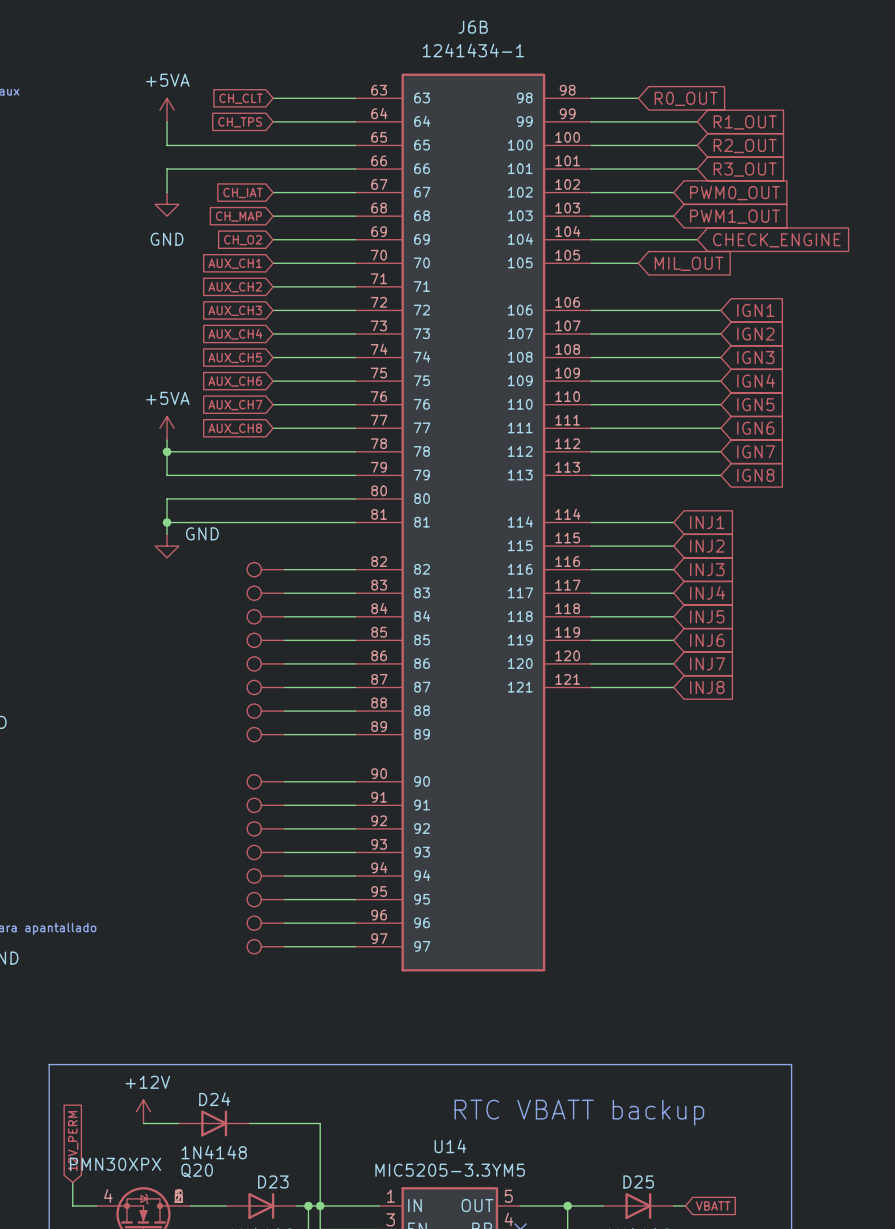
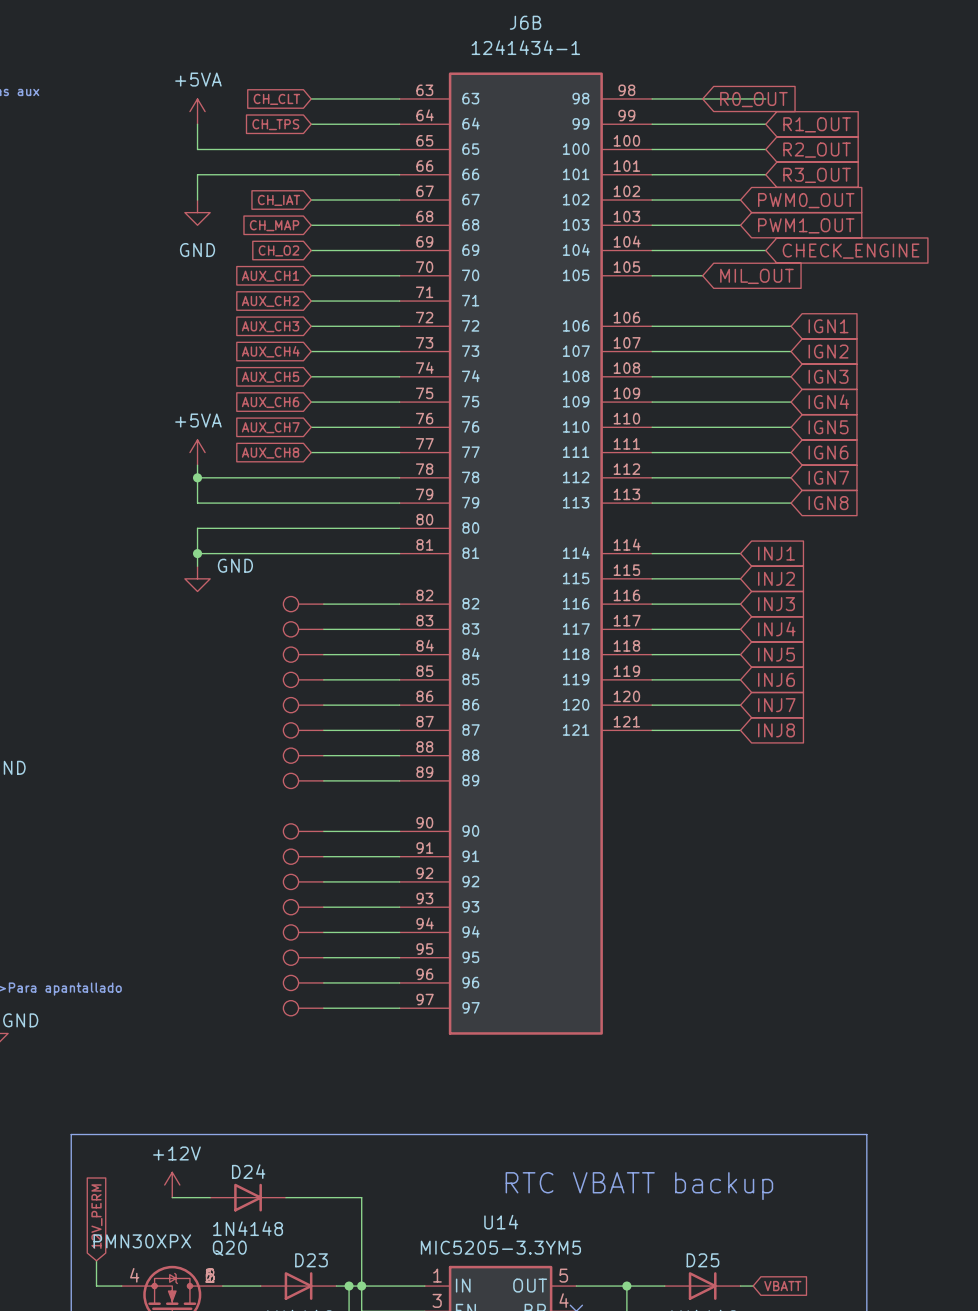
wire: none -> (702, 98) (765, 98)

